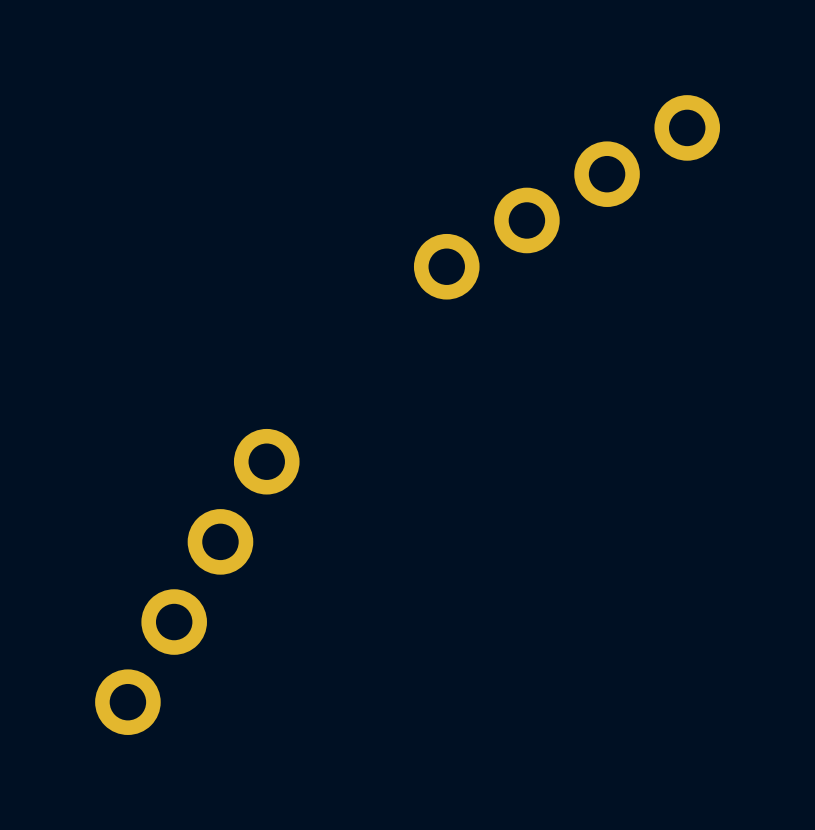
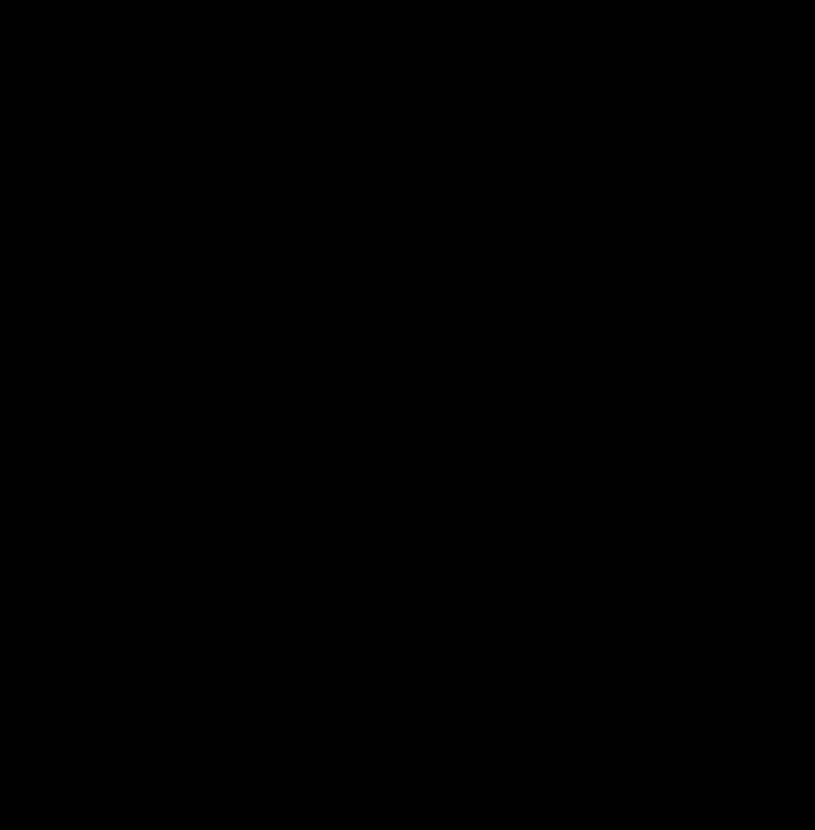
part: (566, 197) -> none
part: (197, 581) -> none

